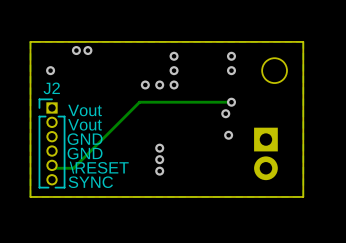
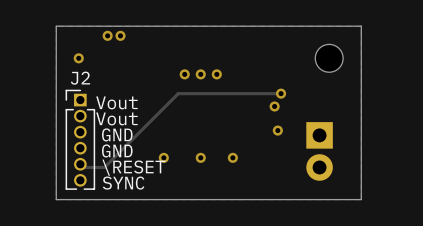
via: (174, 56) -> none
via: (231, 56) -> none
via: (174, 70) -> none
via: (231, 70) -> none
via: (159, 148) -> none
via: none -> (163, 157)
via: none -> (232, 157)
via: (159, 171) -> none

